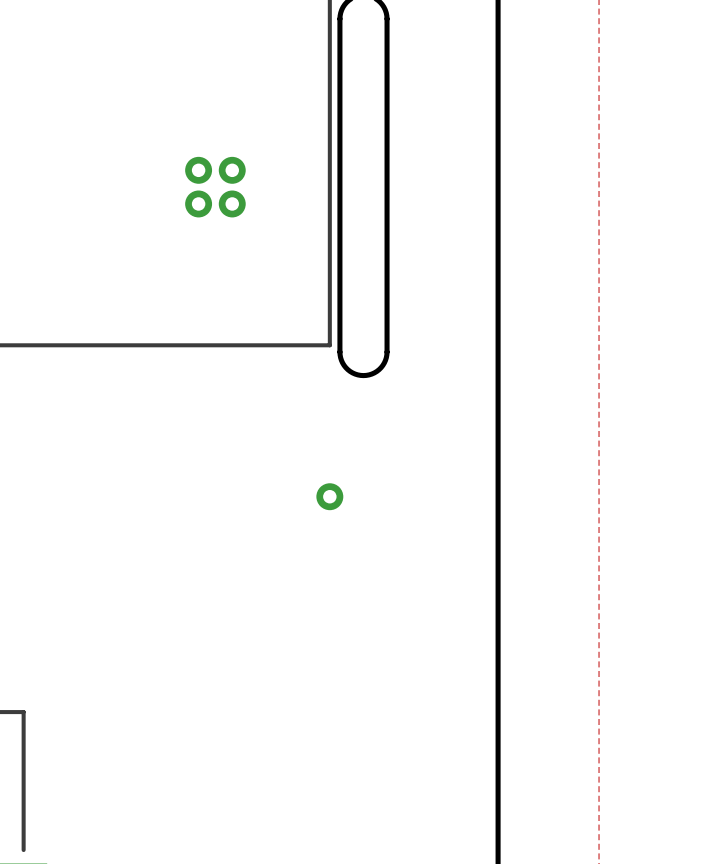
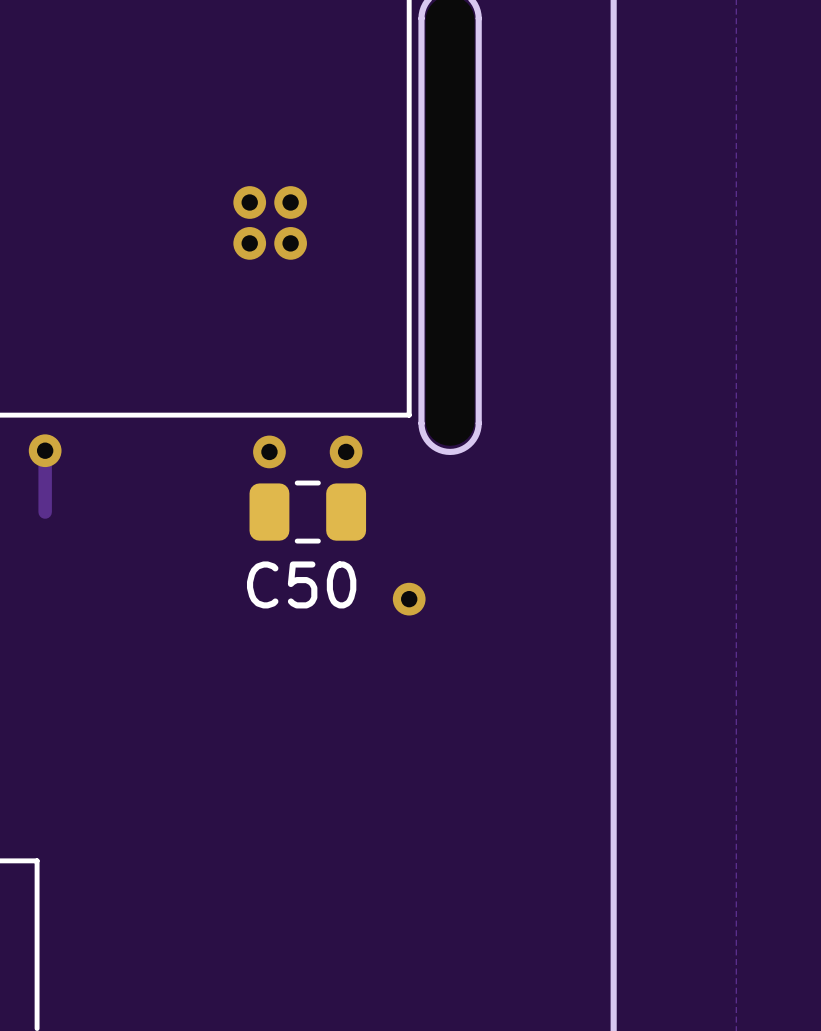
track: none -> (45, 450) (45, 512)
via: none -> (45, 450)
via: none -> (269, 451)
via: none -> (346, 451)
C50: none -> (307, 512)

